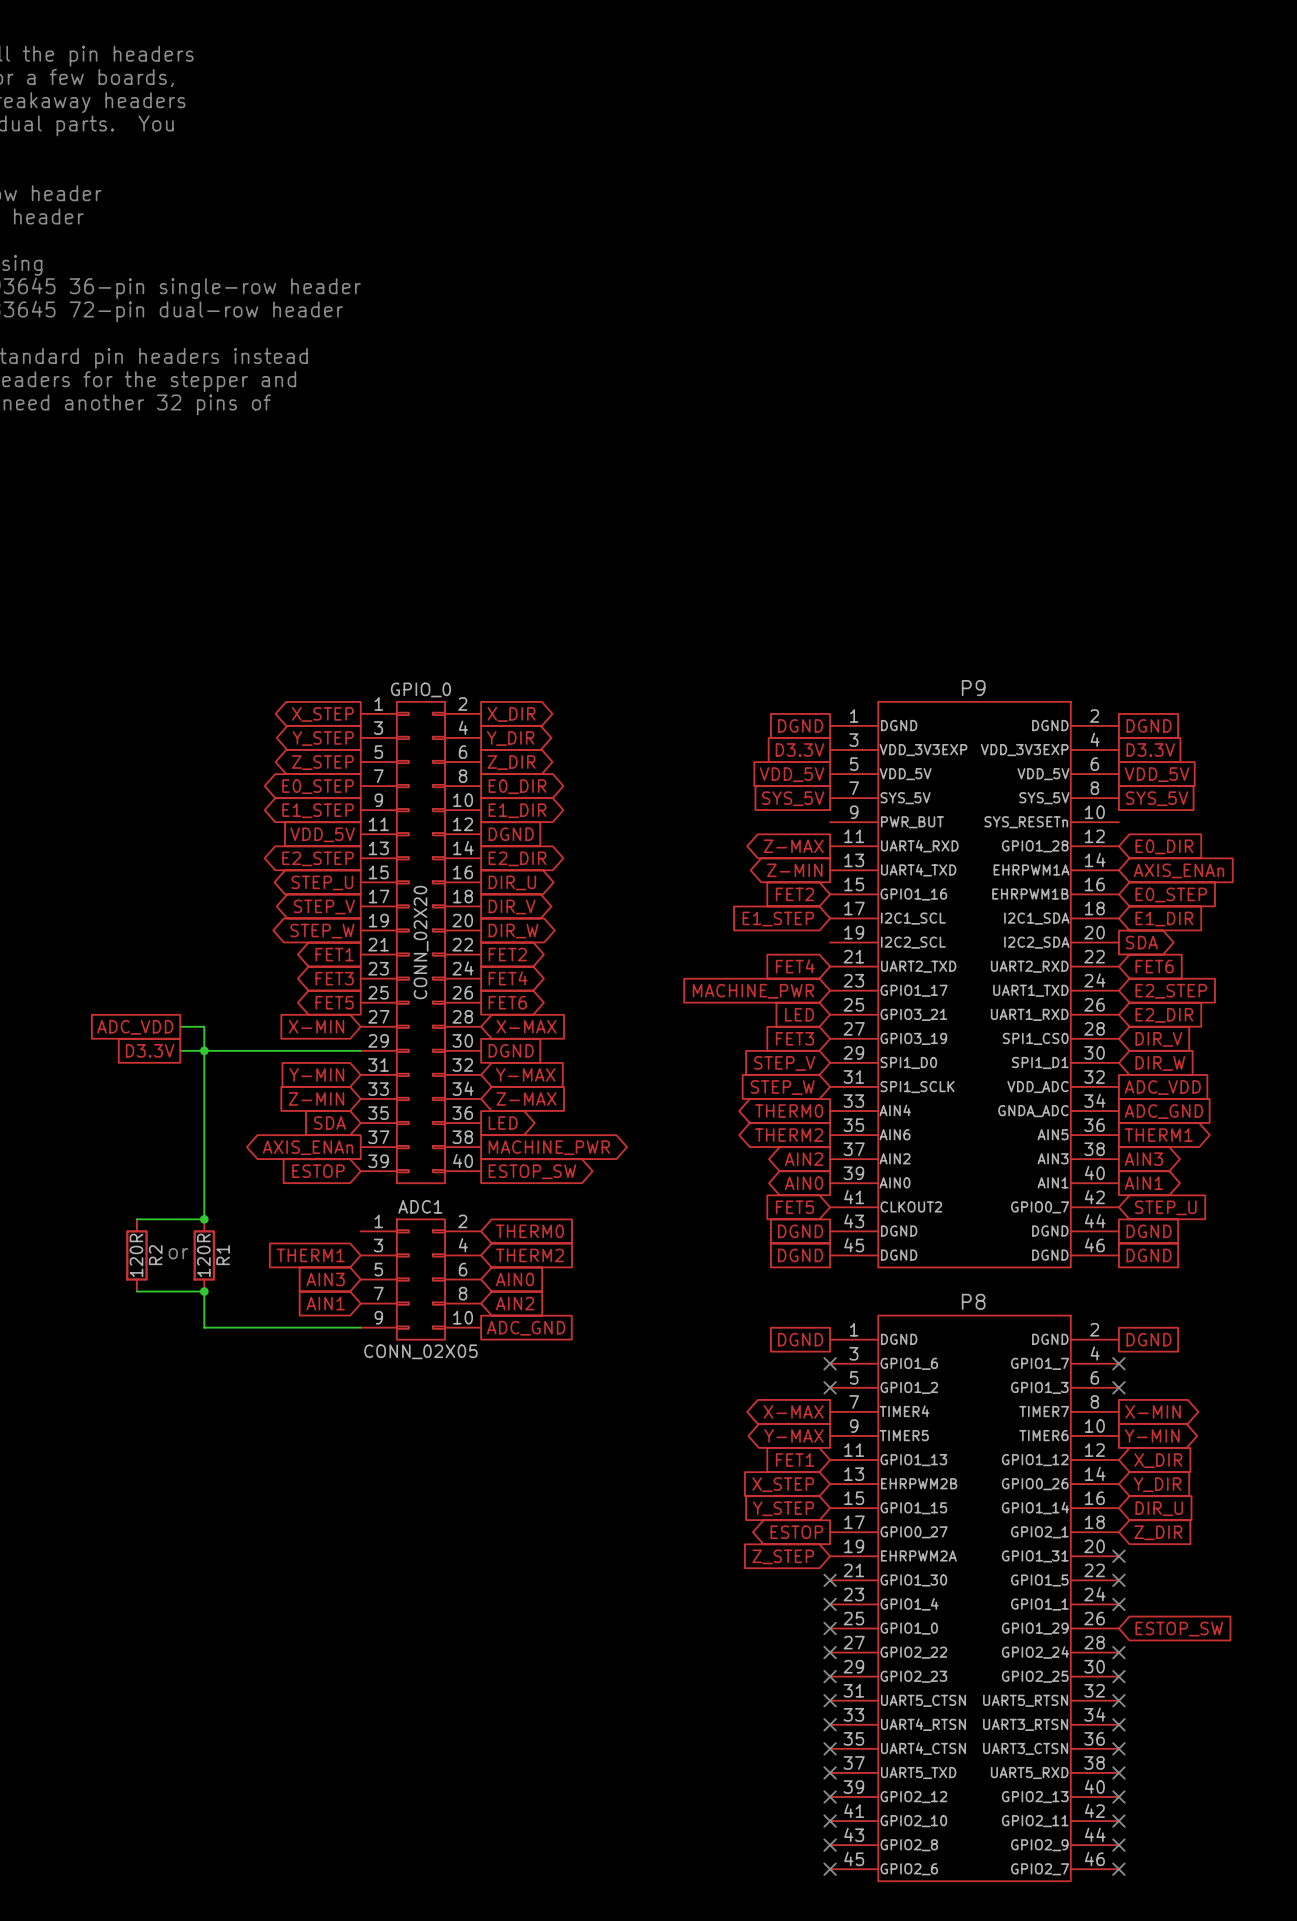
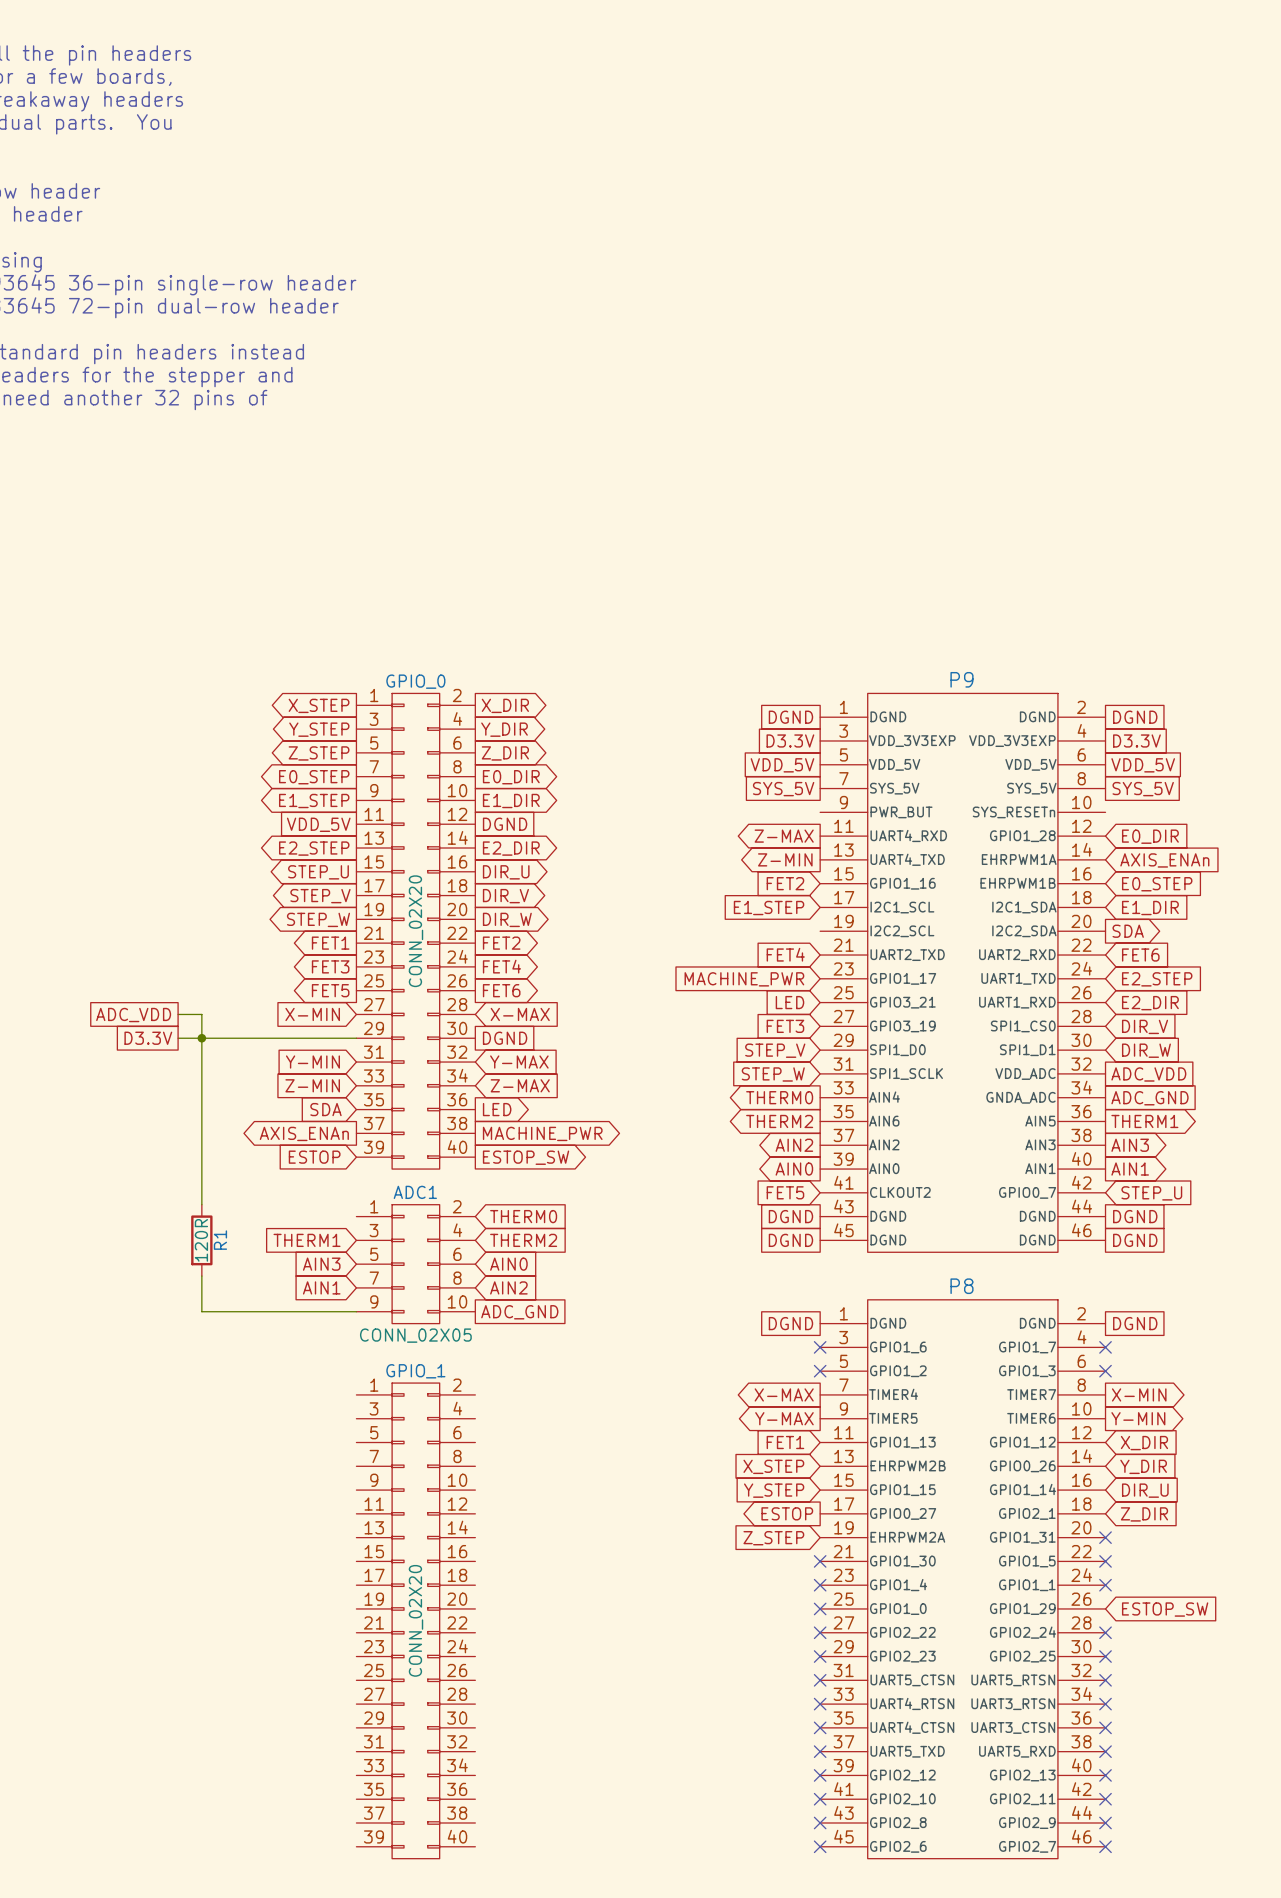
wire: (136, 1219) (204, 1219) -> none
junction: (204, 1219) -> none
text: or (178, 1253) -> none
R2: 120R (136, 1255) -> none
wire: (136, 1291) (204, 1291) -> none
junction: (204, 1291) -> none
GPIO_1: none -> CONN_02X20 (415, 1620)

